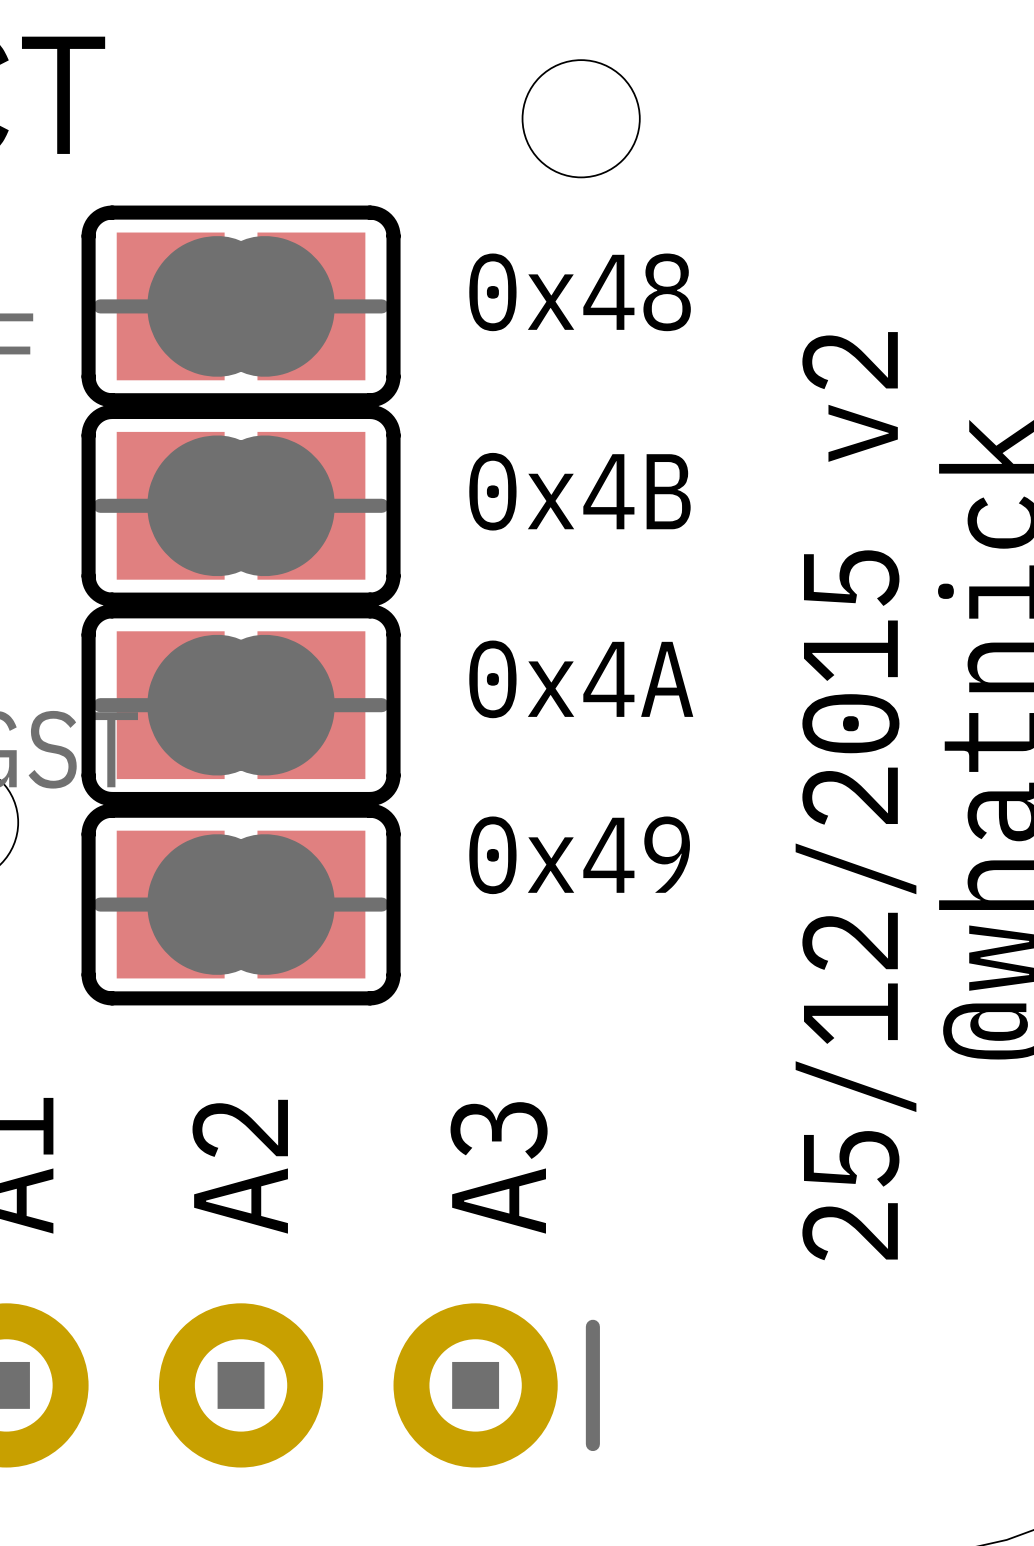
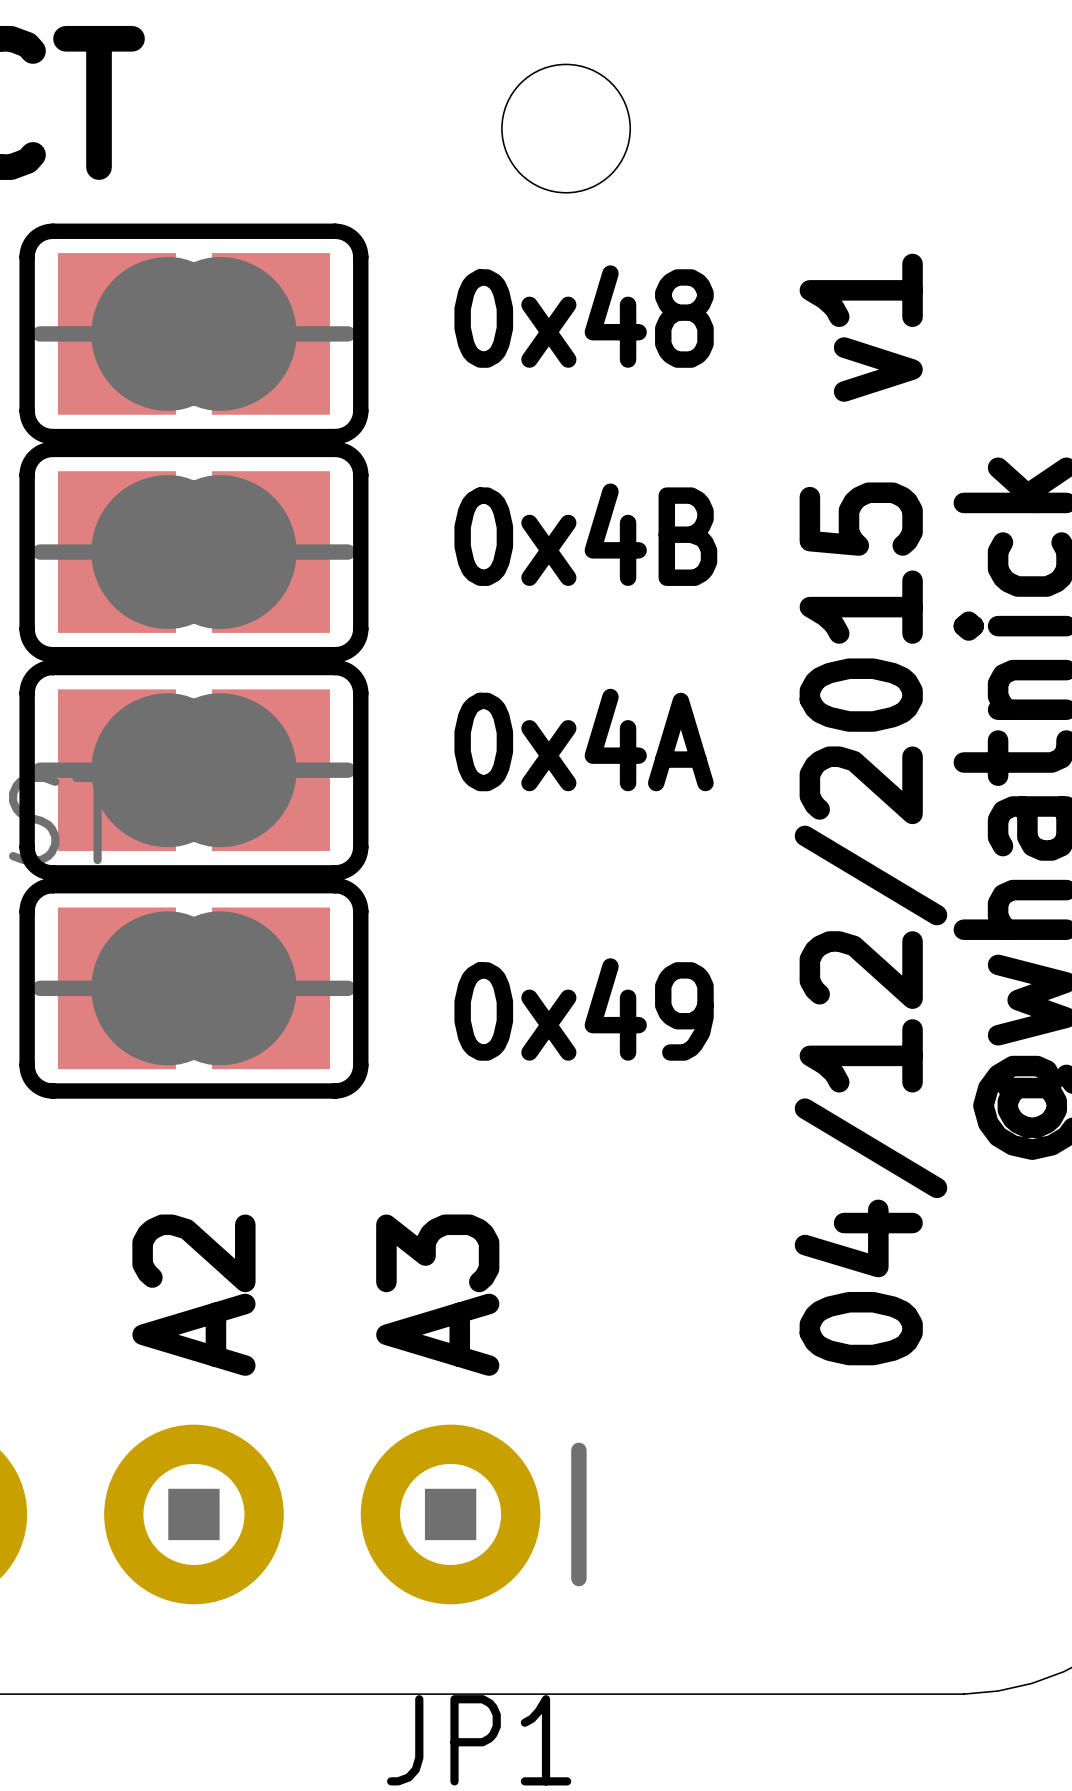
text: 25/12/2015 v2 (856, 796) -> 04/12/2015 v1 (870, 809)
text position: 0x49 (579, 855) -> 0x49 (584, 1009)
text position: A3 (499, 1167) -> A3 (437, 1295)

